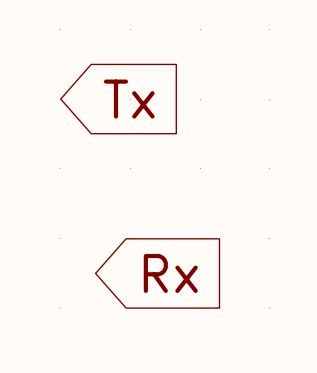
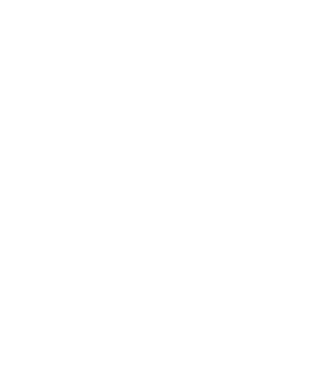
global label: Tx (129, 99) -> none
global label: Rx (170, 273) -> none

